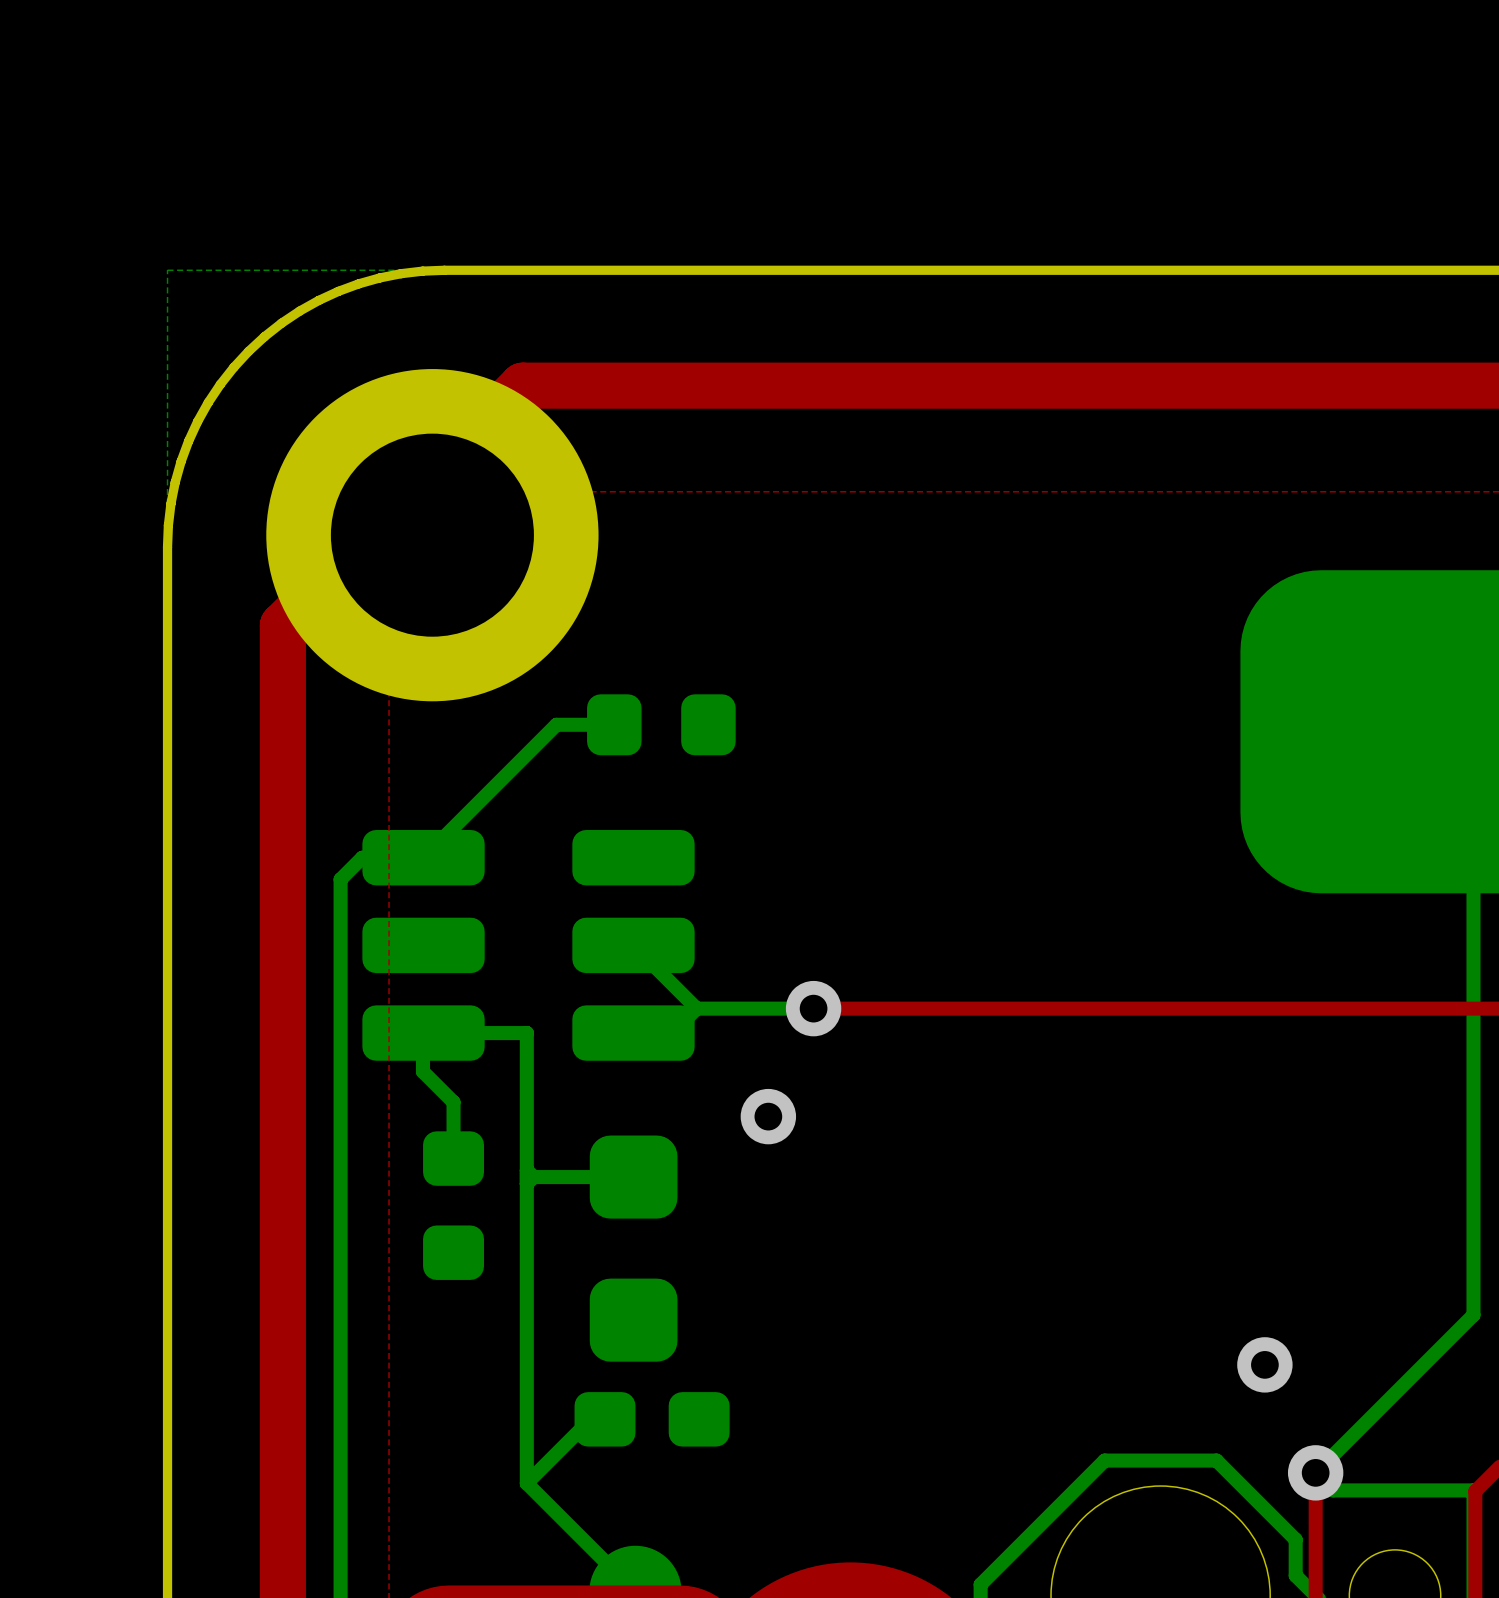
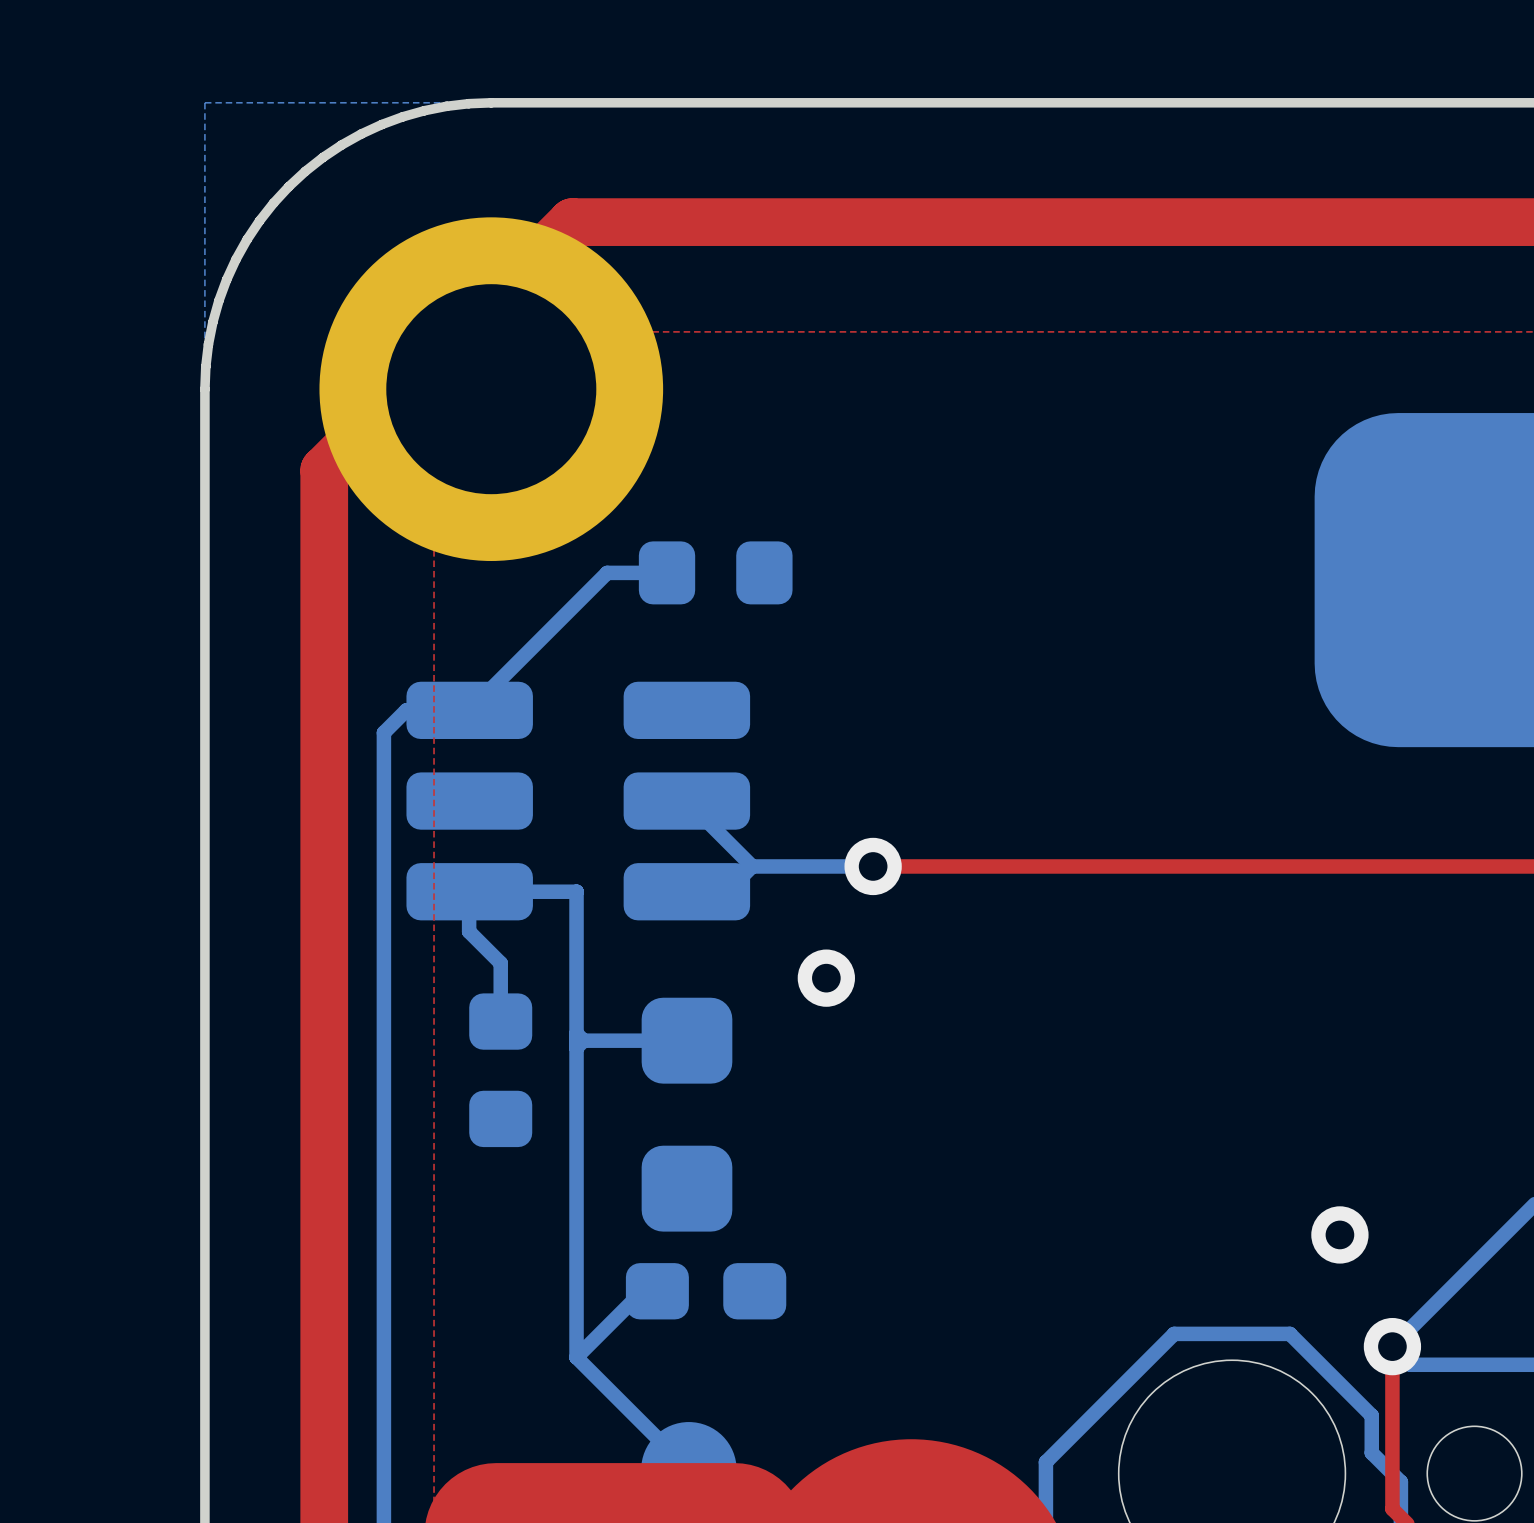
part position: (432, 535) -> (491, 389)

